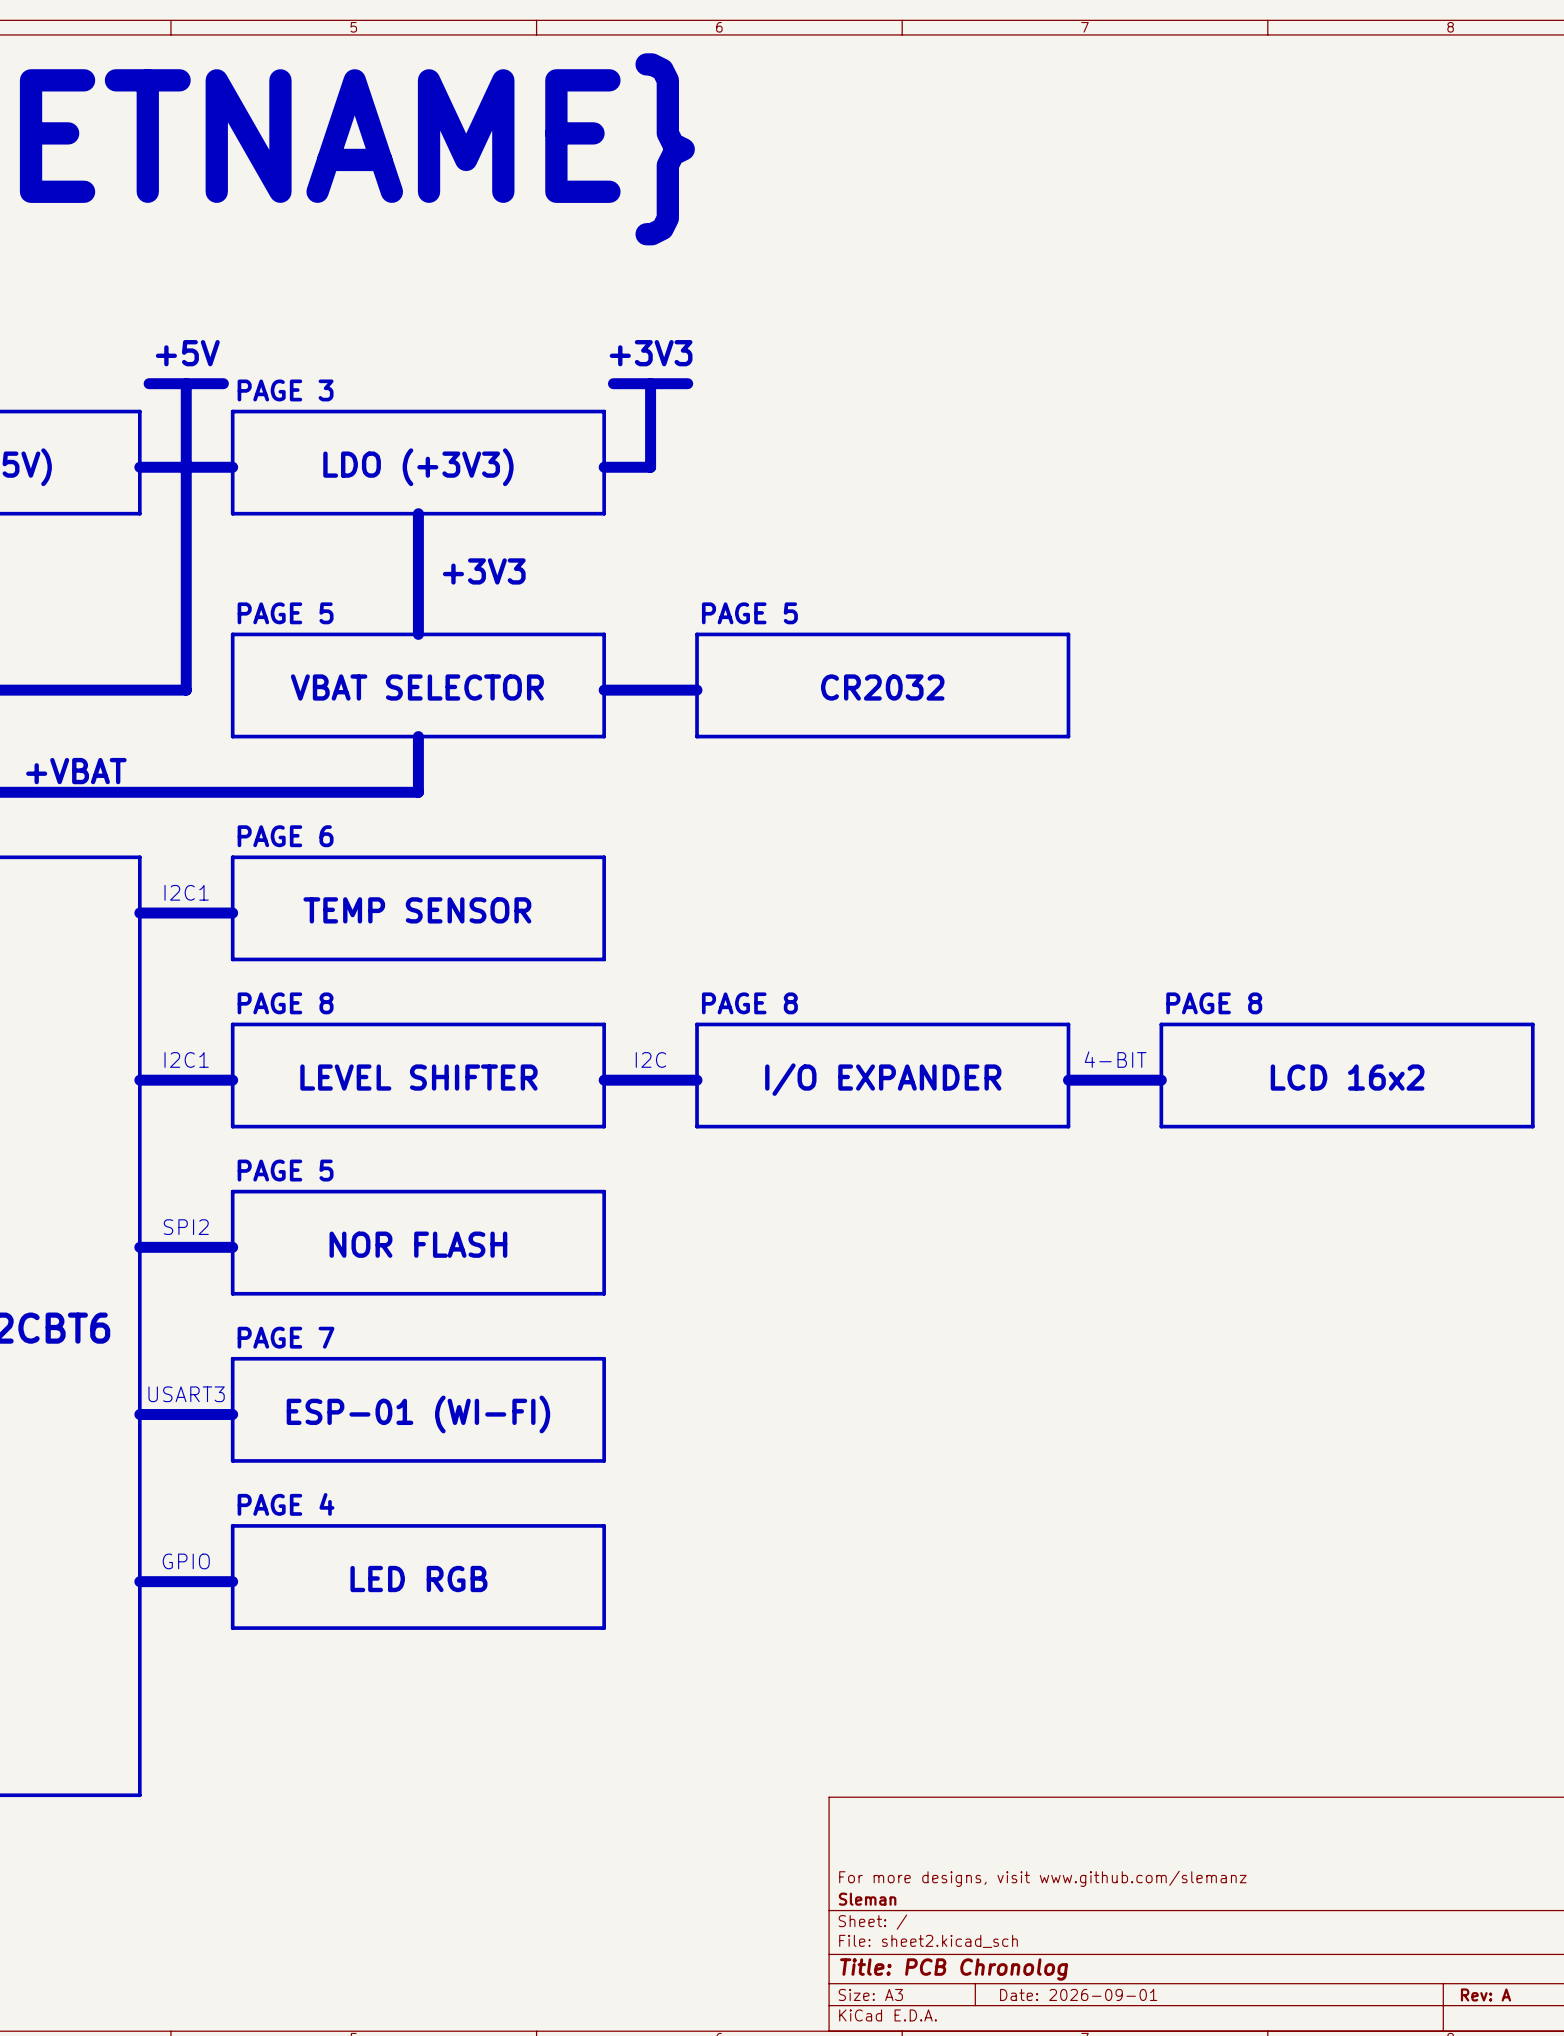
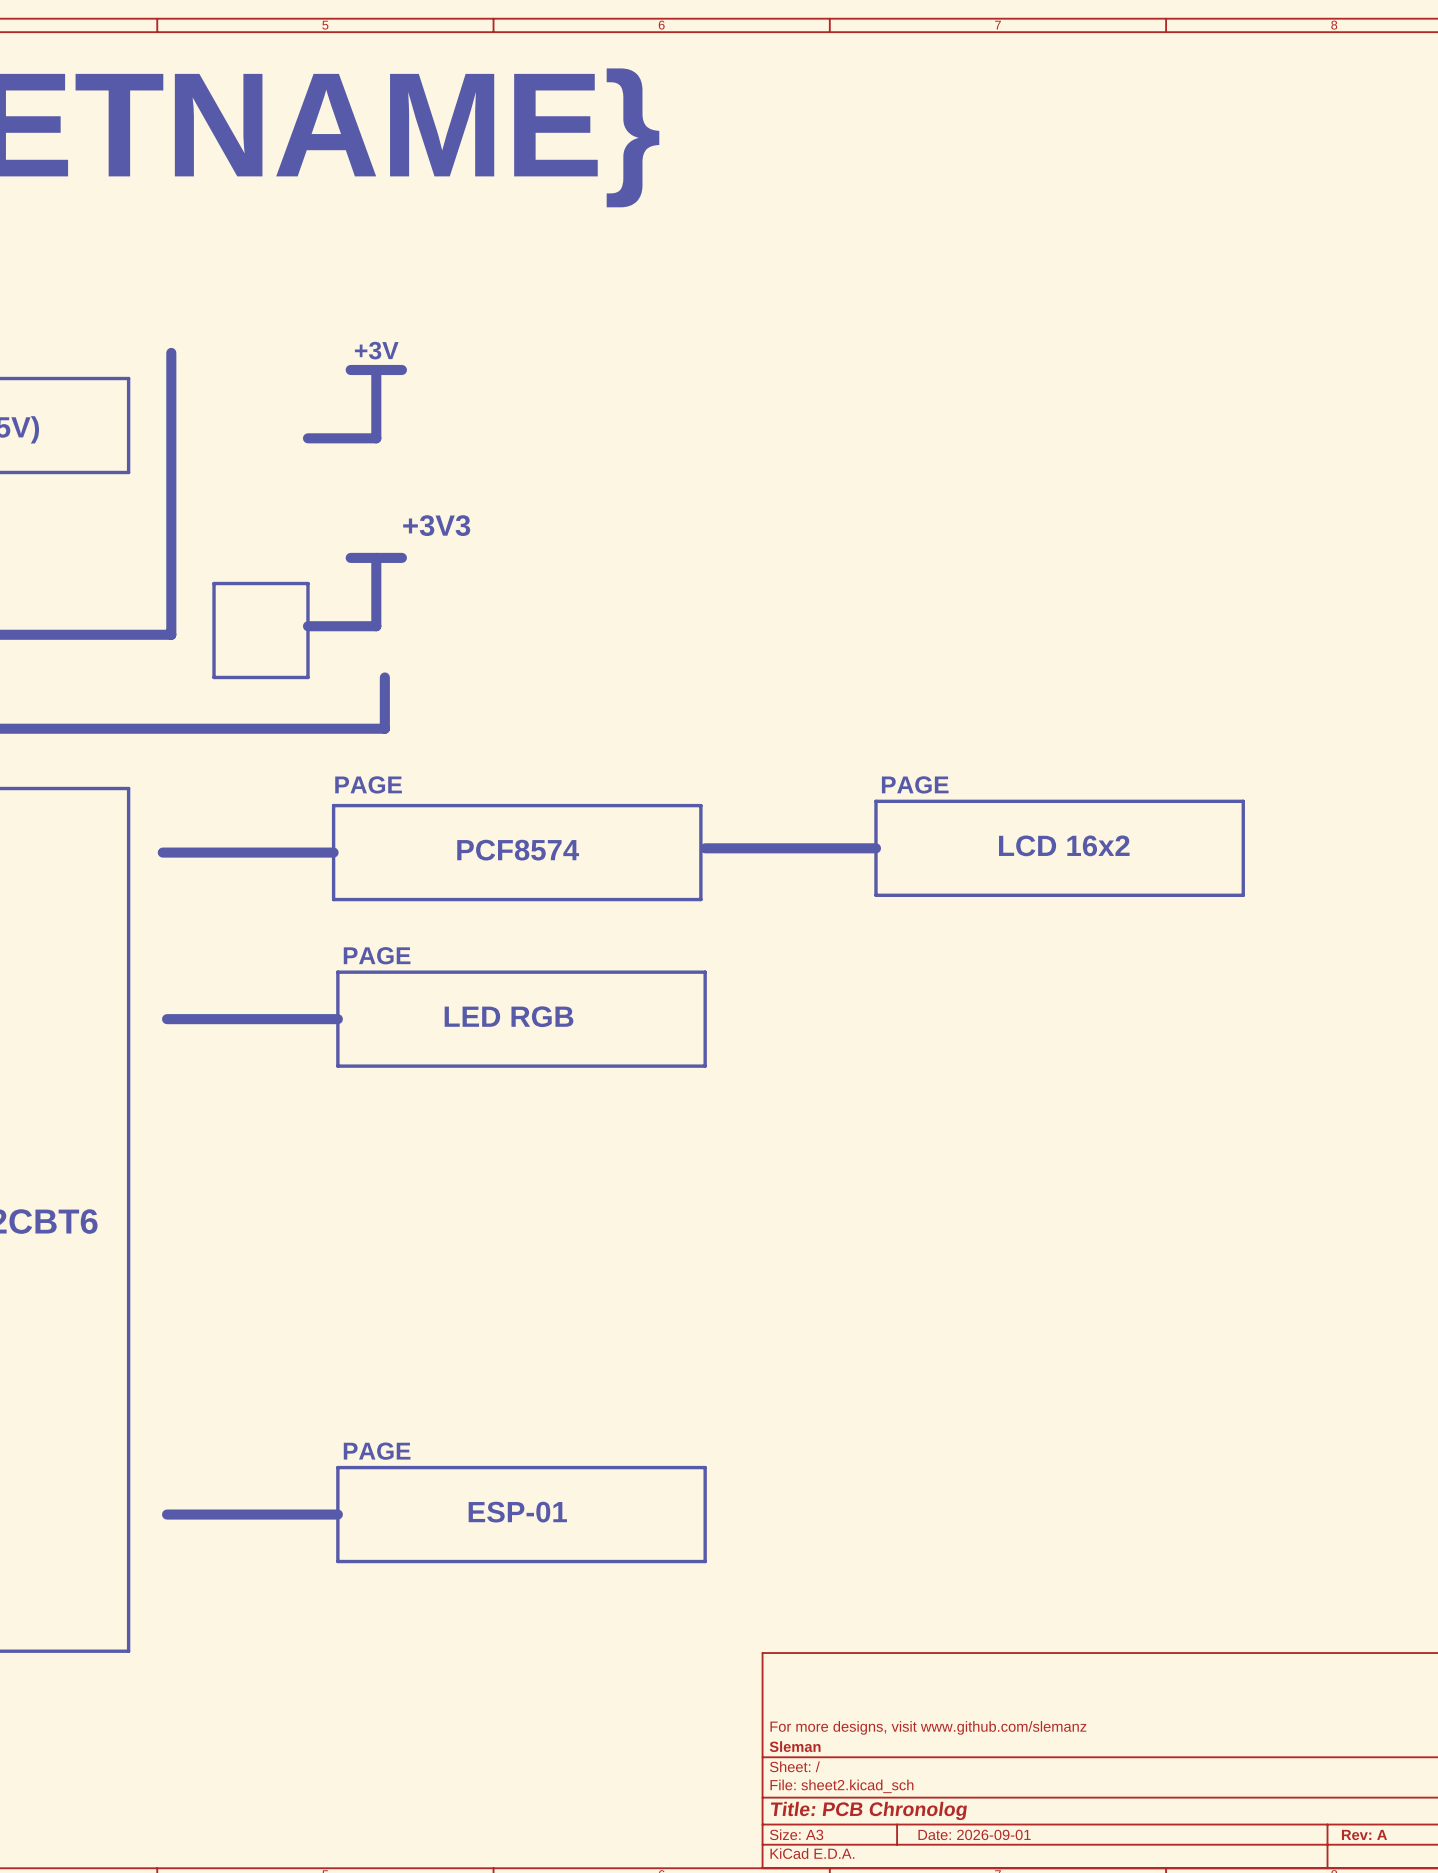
text: +5V (187, 353) -> none
text: +3V3 (651, 353) -> none
text: none -> +3V (376, 350)
line: (149, 383) (223, 383) -> none
line: (613, 383) (687, 383) -> none
line: (650, 383) (650, 467) (604, 467) -> none
text: PAGE 3 (285, 390) -> none
line: none -> (350, 369) (401, 369)
line: none -> (376, 369) (376, 438) (307, 438)
line: (232, 411) (232, 513) (604, 513) (604, 411) (232, 411) -> none
line: (139, 467) (232, 467) -> none
text: LDO (+3V3) (418, 467) -> none
line: (418, 513) (418, 634) -> none
line: none -> (350, 557) (401, 557)
line: none -> (376, 557) (376, 626) (307, 626)
text: PAGE 5 (285, 613) -> none
text: PAGE 5 (749, 613) -> none
line: (334, 634) (604, 634) (604, 736) (334, 736) -> (307, 583) (307, 677)
line: (697, 634) (1068, 634) (1068, 736) (697, 736) (697, 634) -> none
text: VBAT SELECTOR (417, 687) -> none
text: CR2032 (882, 687) -> none
line: (604, 690) (697, 690) -> none
text: +VBAT (76, 771) -> none
text: PAGE 6 (285, 836) -> none
text: none -> PAGE (368, 784)
text: none -> PAGE (915, 784)
line: (232, 857) (604, 857) (604, 959) (232, 959) (232, 857) -> none
line: none -> (875, 801) (1243, 801) (1243, 895) (875, 895) (875, 801)
line: none -> (333, 805) (700, 805) (700, 899) (333, 899) (333, 805)
text: I2C1 (186, 892) -> none
text: TEMP SENSOR (417, 910) -> none
line: (139, 913) (232, 913) -> none
text: none -> LCD 16x2 (1064, 845)
line: none -> (705, 848) (875, 848)
text: none -> PCF8574 (518, 850)
line: none -> (162, 852) (333, 852)
text: PAGE 8 (285, 1003) -> none
text: PAGE 8 (749, 1003) -> none
text: PAGE 8 (1214, 1003) -> none
line: (232, 1024) (232, 1126) (604, 1126) (604, 1024) (232, 1024) -> none
line: (697, 1024) (1068, 1024) (1068, 1126) (697, 1126) (697, 1024) -> none
line: (1161, 1024) (1532, 1024) (1532, 1126) (1161, 1126) (1161, 1024) -> none
text: none -> PAGE (377, 955)
line: none -> (337, 972) (705, 972) (705, 1066) (337, 1066) (337, 972)
text: I2C1 (186, 1059) -> none
text: I2C (650, 1059) -> none
text: 4-BIT (1115, 1059) -> none
text: LEVEL SHIFTER (418, 1077) -> none
text: LCD 16x2 (1347, 1077) -> none
text: I/O EXPANDER (883, 1079) -> none
line: (139, 1080) (232, 1080) -> none
line: (604, 1080) (697, 1080) -> none
line: (1068, 1080) (1161, 1080) -> none
text: none -> LED RGB (509, 1016)
line: none -> (167, 1019) (337, 1019)
text: PAGE 5 (285, 1170) -> none
line: (232, 1191) (232, 1293) (604, 1293) (604, 1191) (232, 1191) -> none
text: SPI2 (186, 1227) -> none
text: NOR FLASH (418, 1244) -> none
line: (139, 1247) (232, 1247) -> none
text: PAGE 7 (286, 1337) -> none
line: (232, 1358) (232, 1460) (604, 1460) (604, 1358) (232, 1358) -> none
text: USART3 (186, 1394) -> none
line: (139, 1414) (232, 1414) -> none
text: ESP-01 (WI-FI) (418, 1414) -> none
text: PAGE 4 (286, 1504) -> none
line: (232, 1525) (604, 1525) (604, 1628) (232, 1628) (232, 1525) -> none
text: GPIO (186, 1561) -> none
text: none -> PAGE (377, 1451)
text: LED RGB (418, 1579) -> none
line: (139, 1581) (232, 1581) -> none
line: none -> (337, 1467) (705, 1467) (705, 1561) (337, 1561) (337, 1467)
text: none -> ESP-01 (517, 1512)
line: none -> (167, 1514) (337, 1514)

